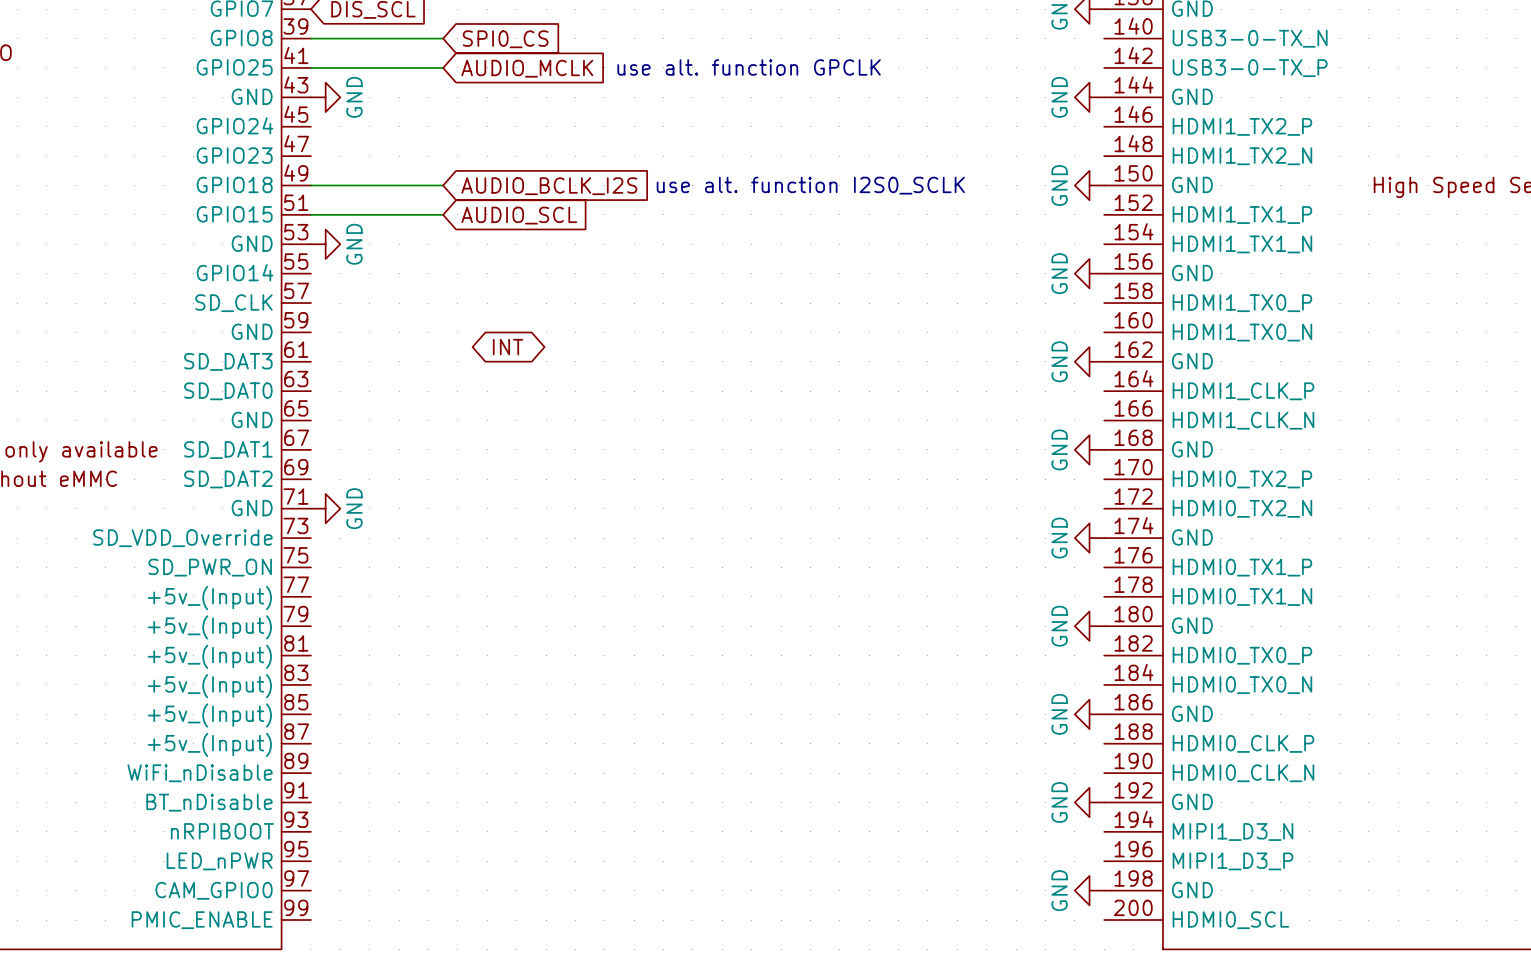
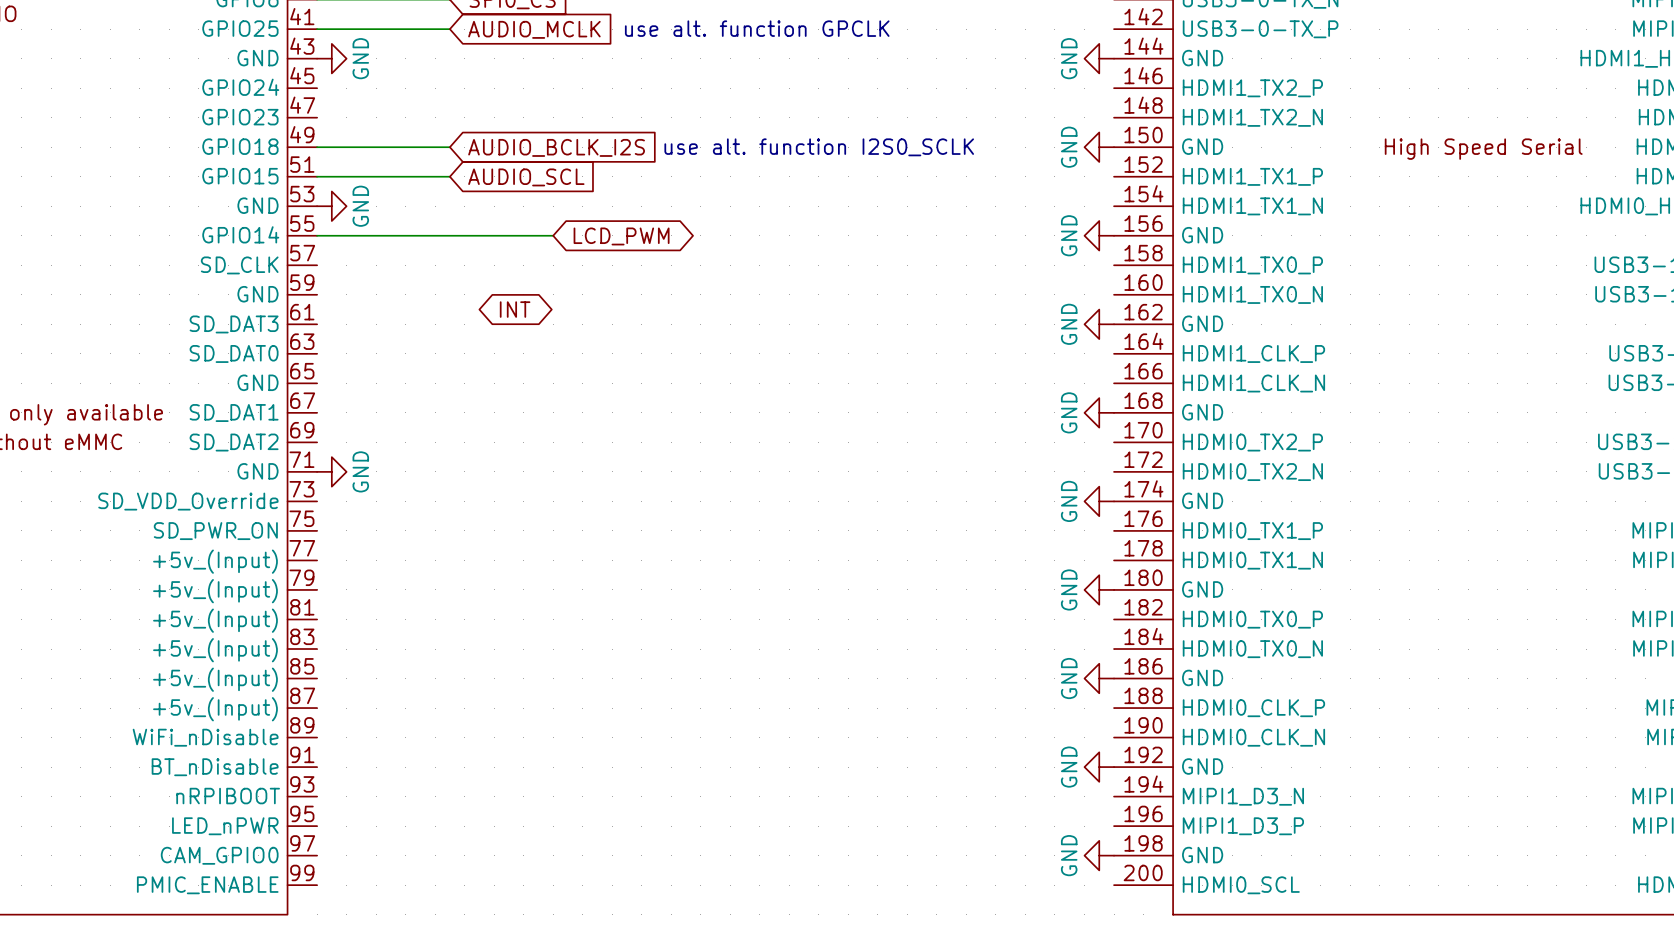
wire: none -> (317, 235) (553, 235)
global label: none -> LCD_PWM (621, 236)

